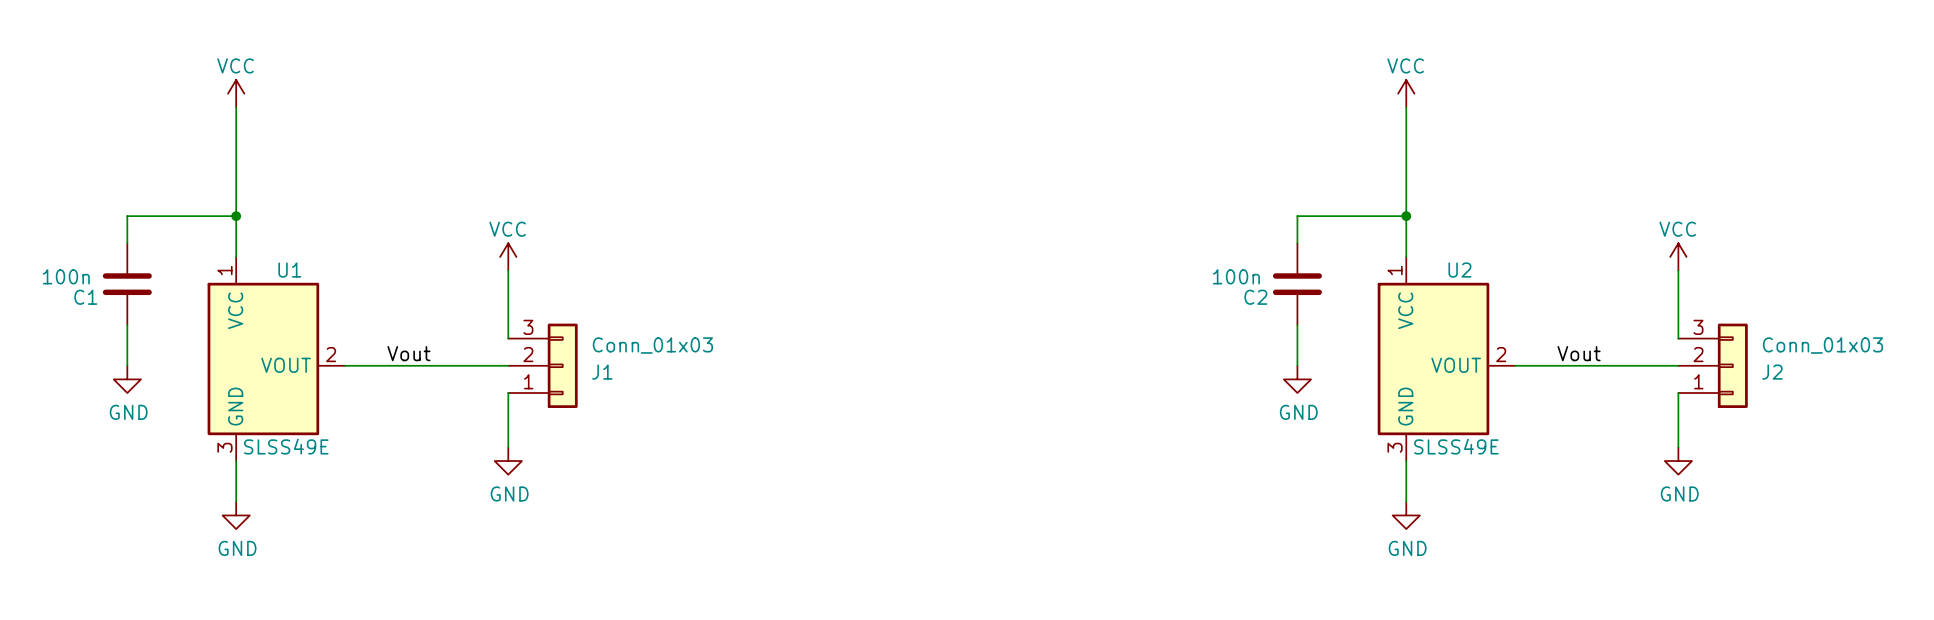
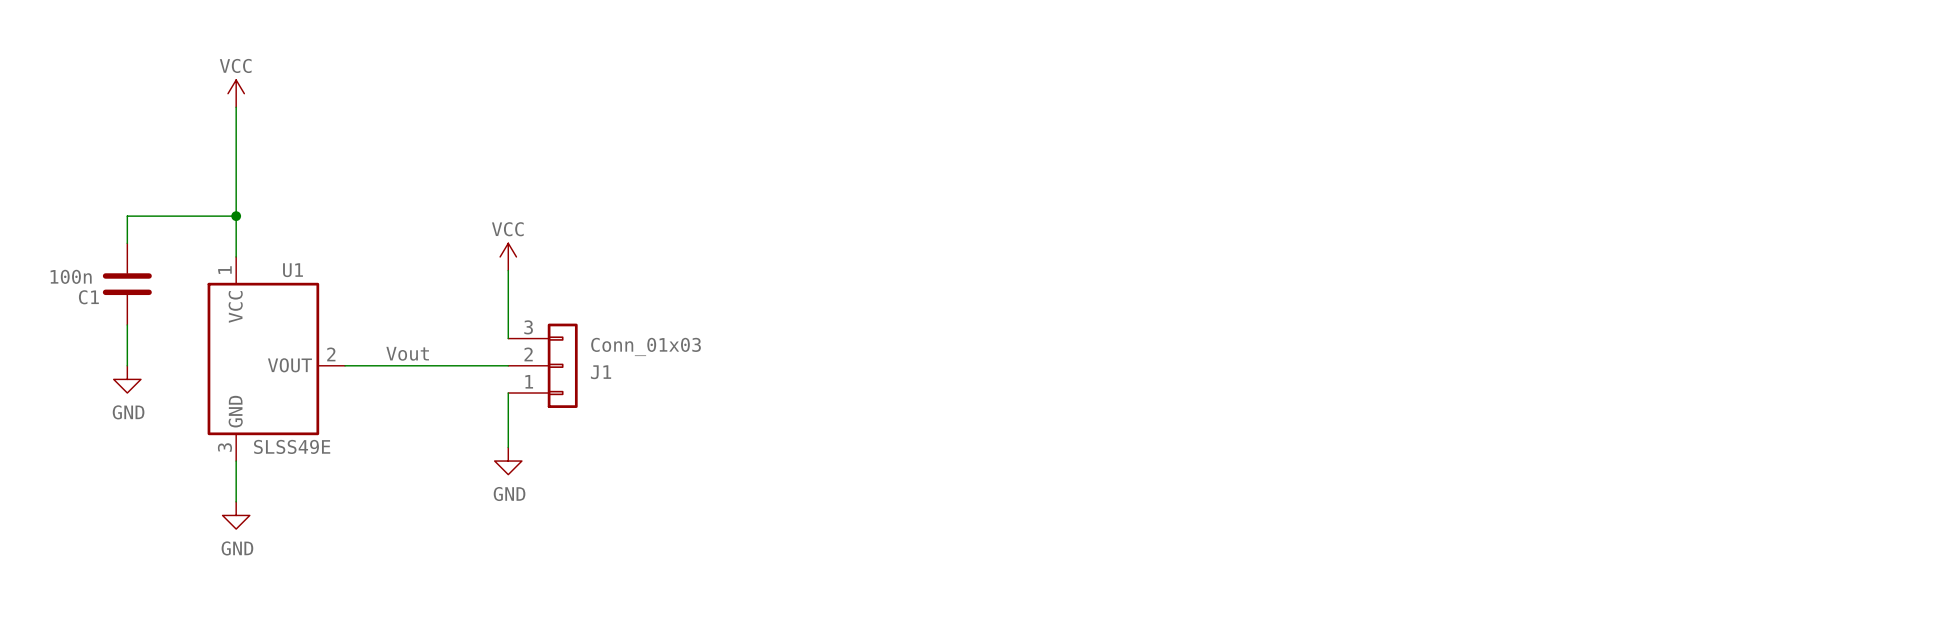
power symbol: VCC (1406, 93) -> none
wire: (1406, 107) (1406, 256) -> none
wire: (1406, 216) (1297, 216) (1297, 243) -> none
junction: (1406, 216) -> none
power symbol: VCC (1678, 256) -> none
wire: (1678, 270) (1678, 338) -> none
C2: 100n (1297, 284) -> none
wire: (1297, 324) (1297, 365) -> none
U2: SLSS49E (1446, 352) -> none
label: Vout (1579, 353) -> none
wire: (1515, 365) (1678, 365) -> none
J2: Conn_01x03 (1713, 365) -> none
power symbol: GND (1297, 379) -> none
wire: (1678, 393) (1678, 447) -> none
wire: (1406, 461) (1406, 501) -> none
power symbol: GND (1678, 461) -> none
power symbol: GND (1406, 515) -> none

